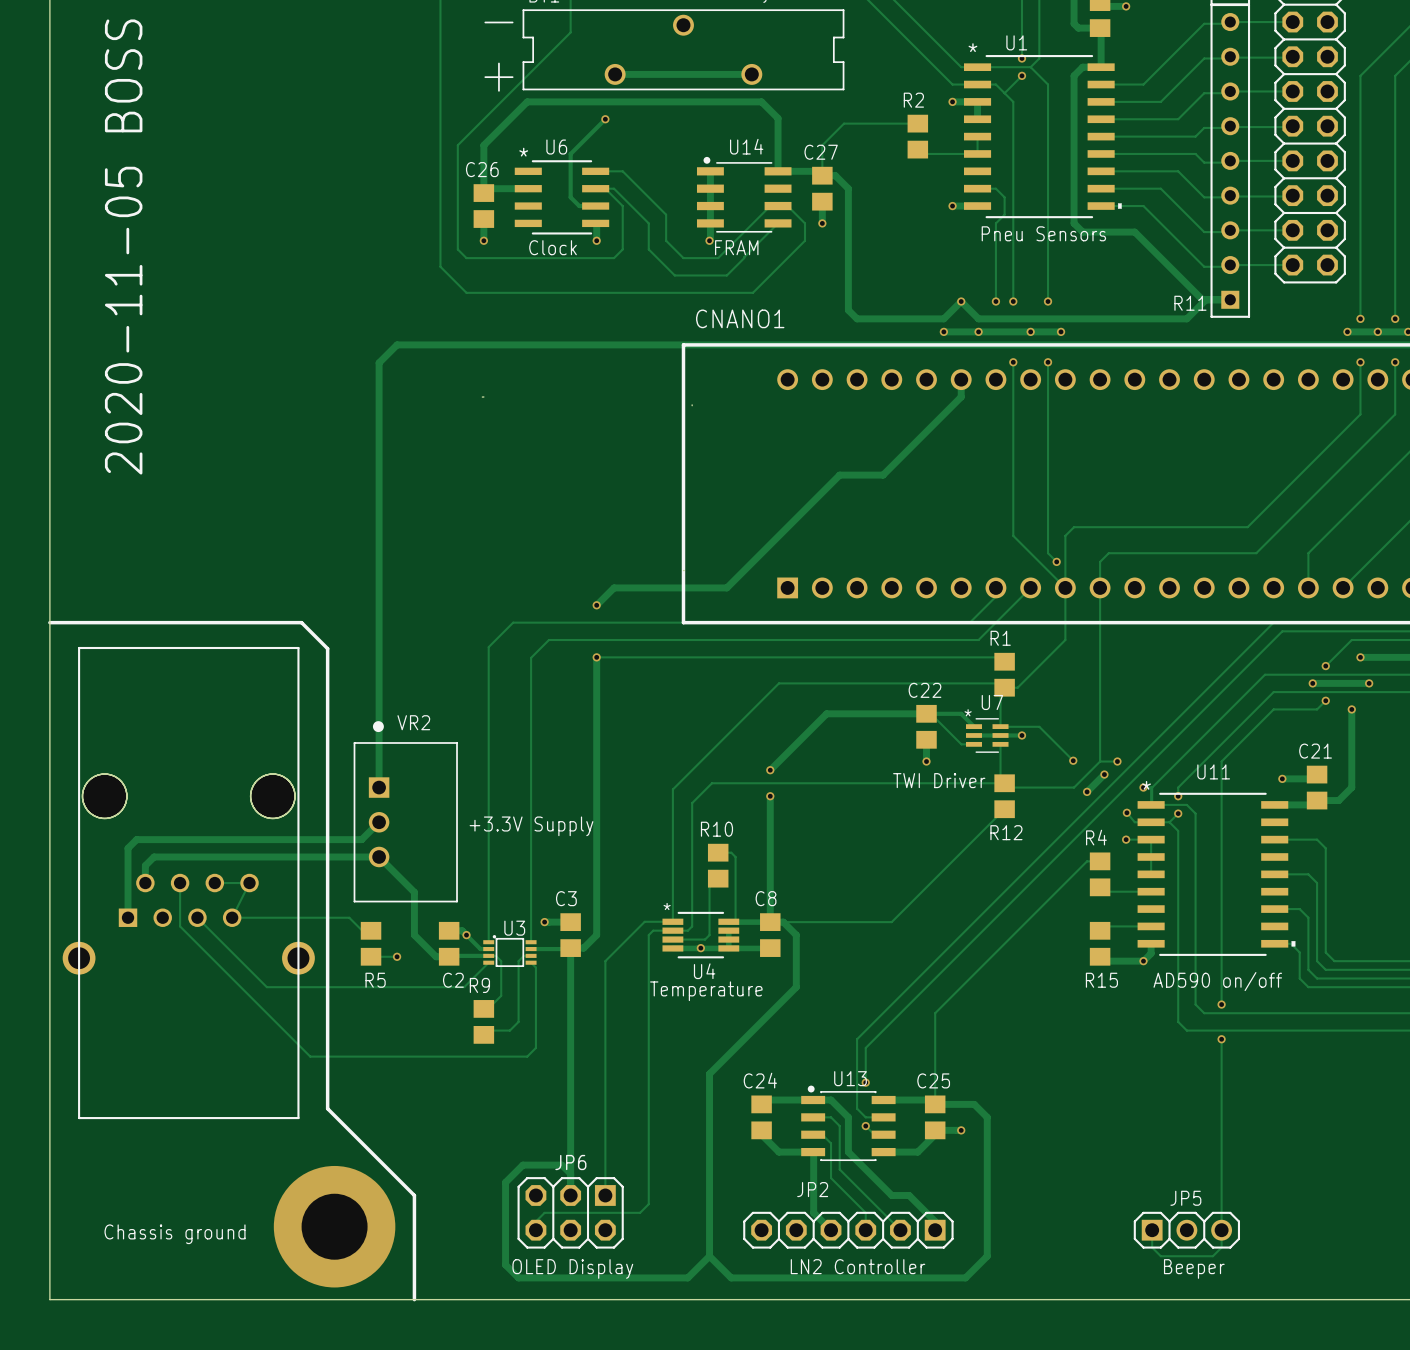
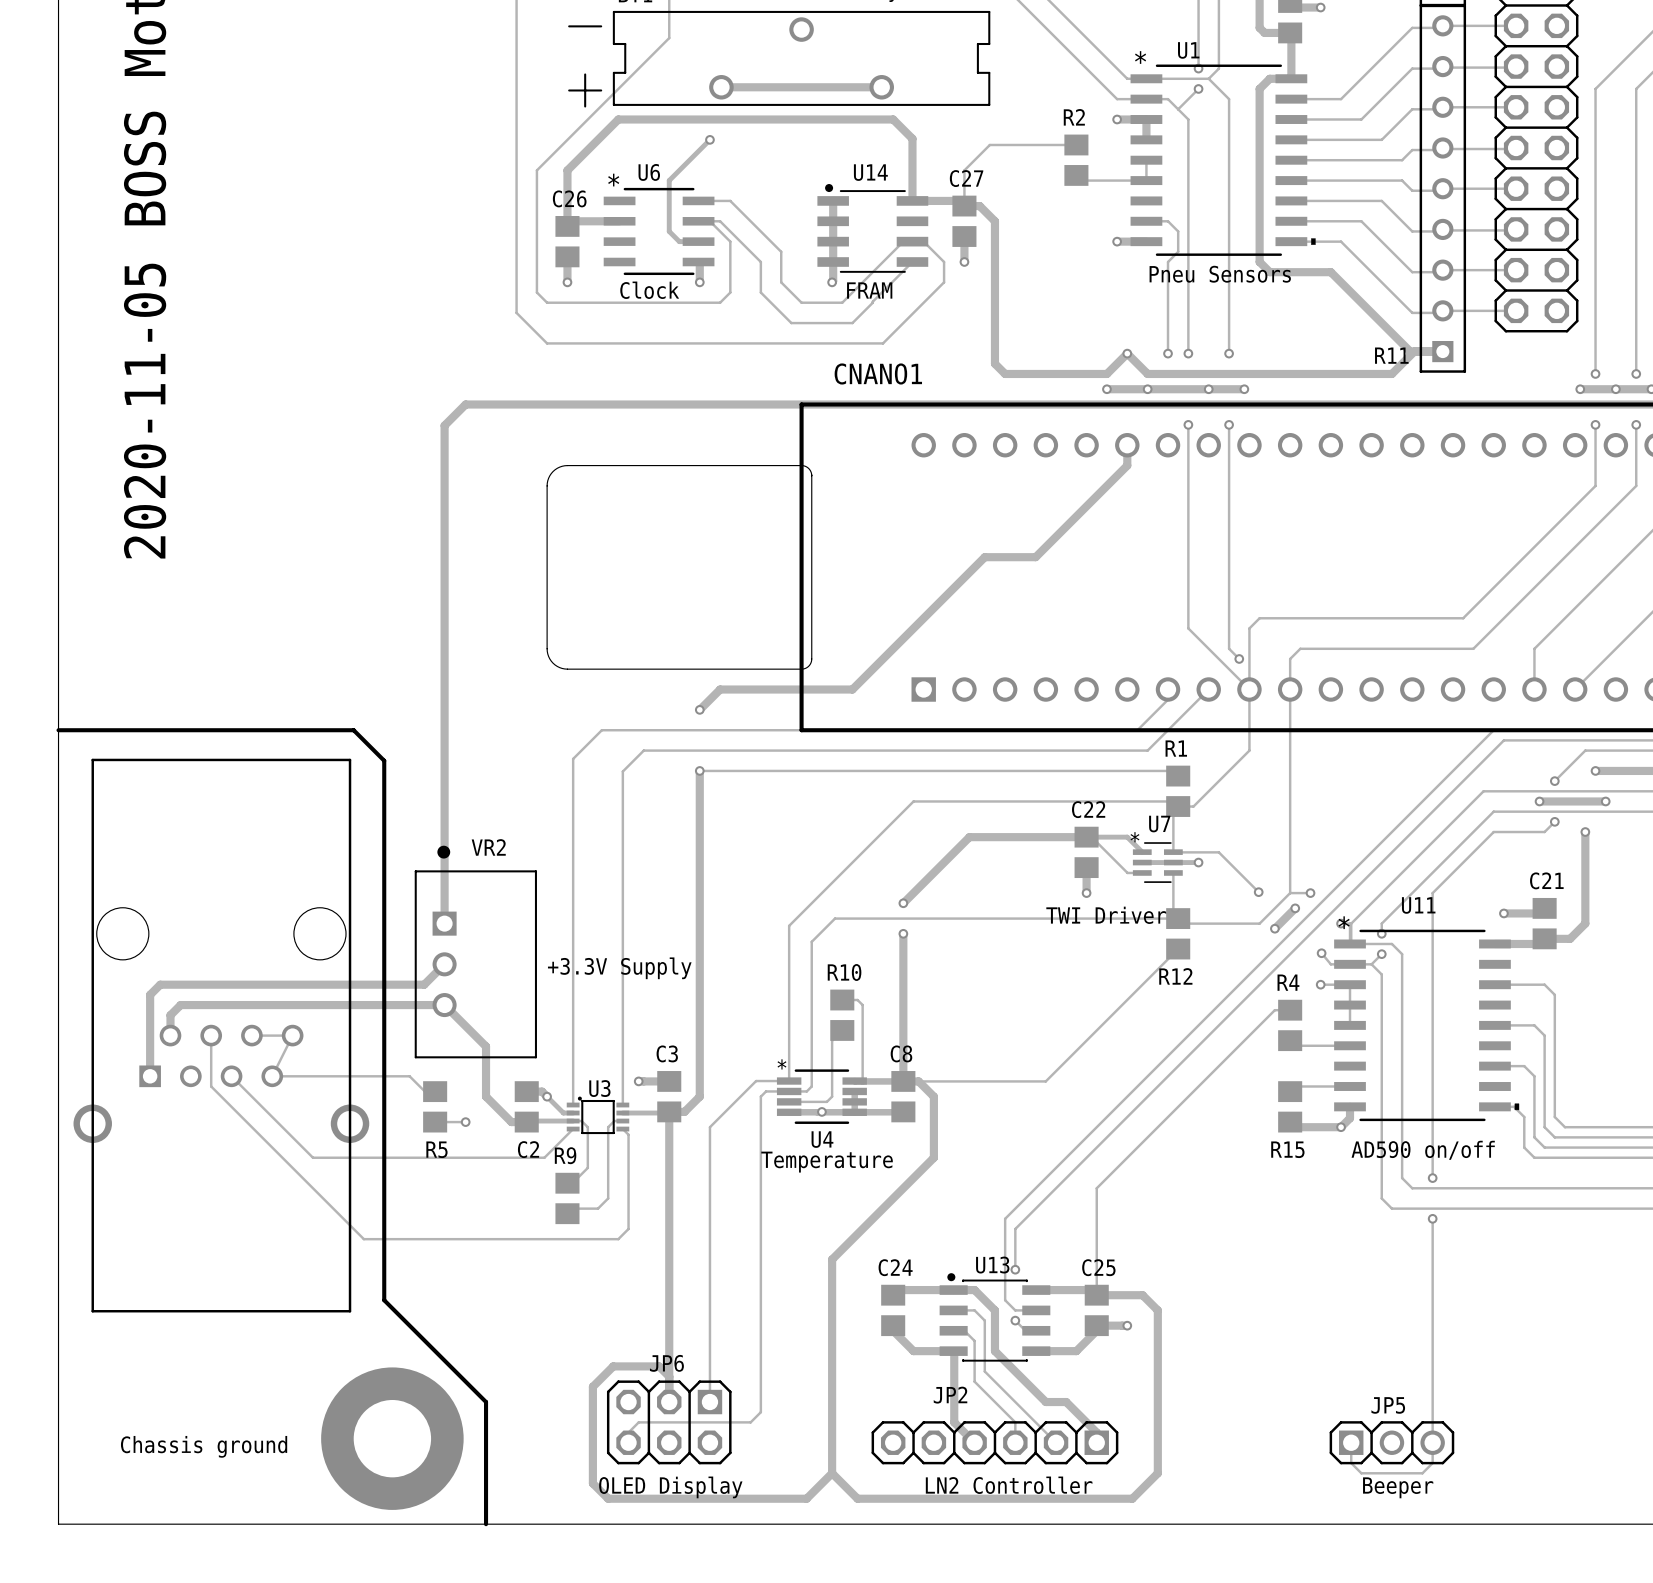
board edge: (482, 397) (483, 396) -> (567, 465) (559, 467) (553, 471) (548, 478) (547, 485) (547, 648) (549, 658) (555, 664) (567, 669) (801, 669) (809, 665) (811, 658) (811, 475) (807, 467) (801, 465) (567, 465)
hole: (104, 796) -> none
hole: (272, 796) -> none

